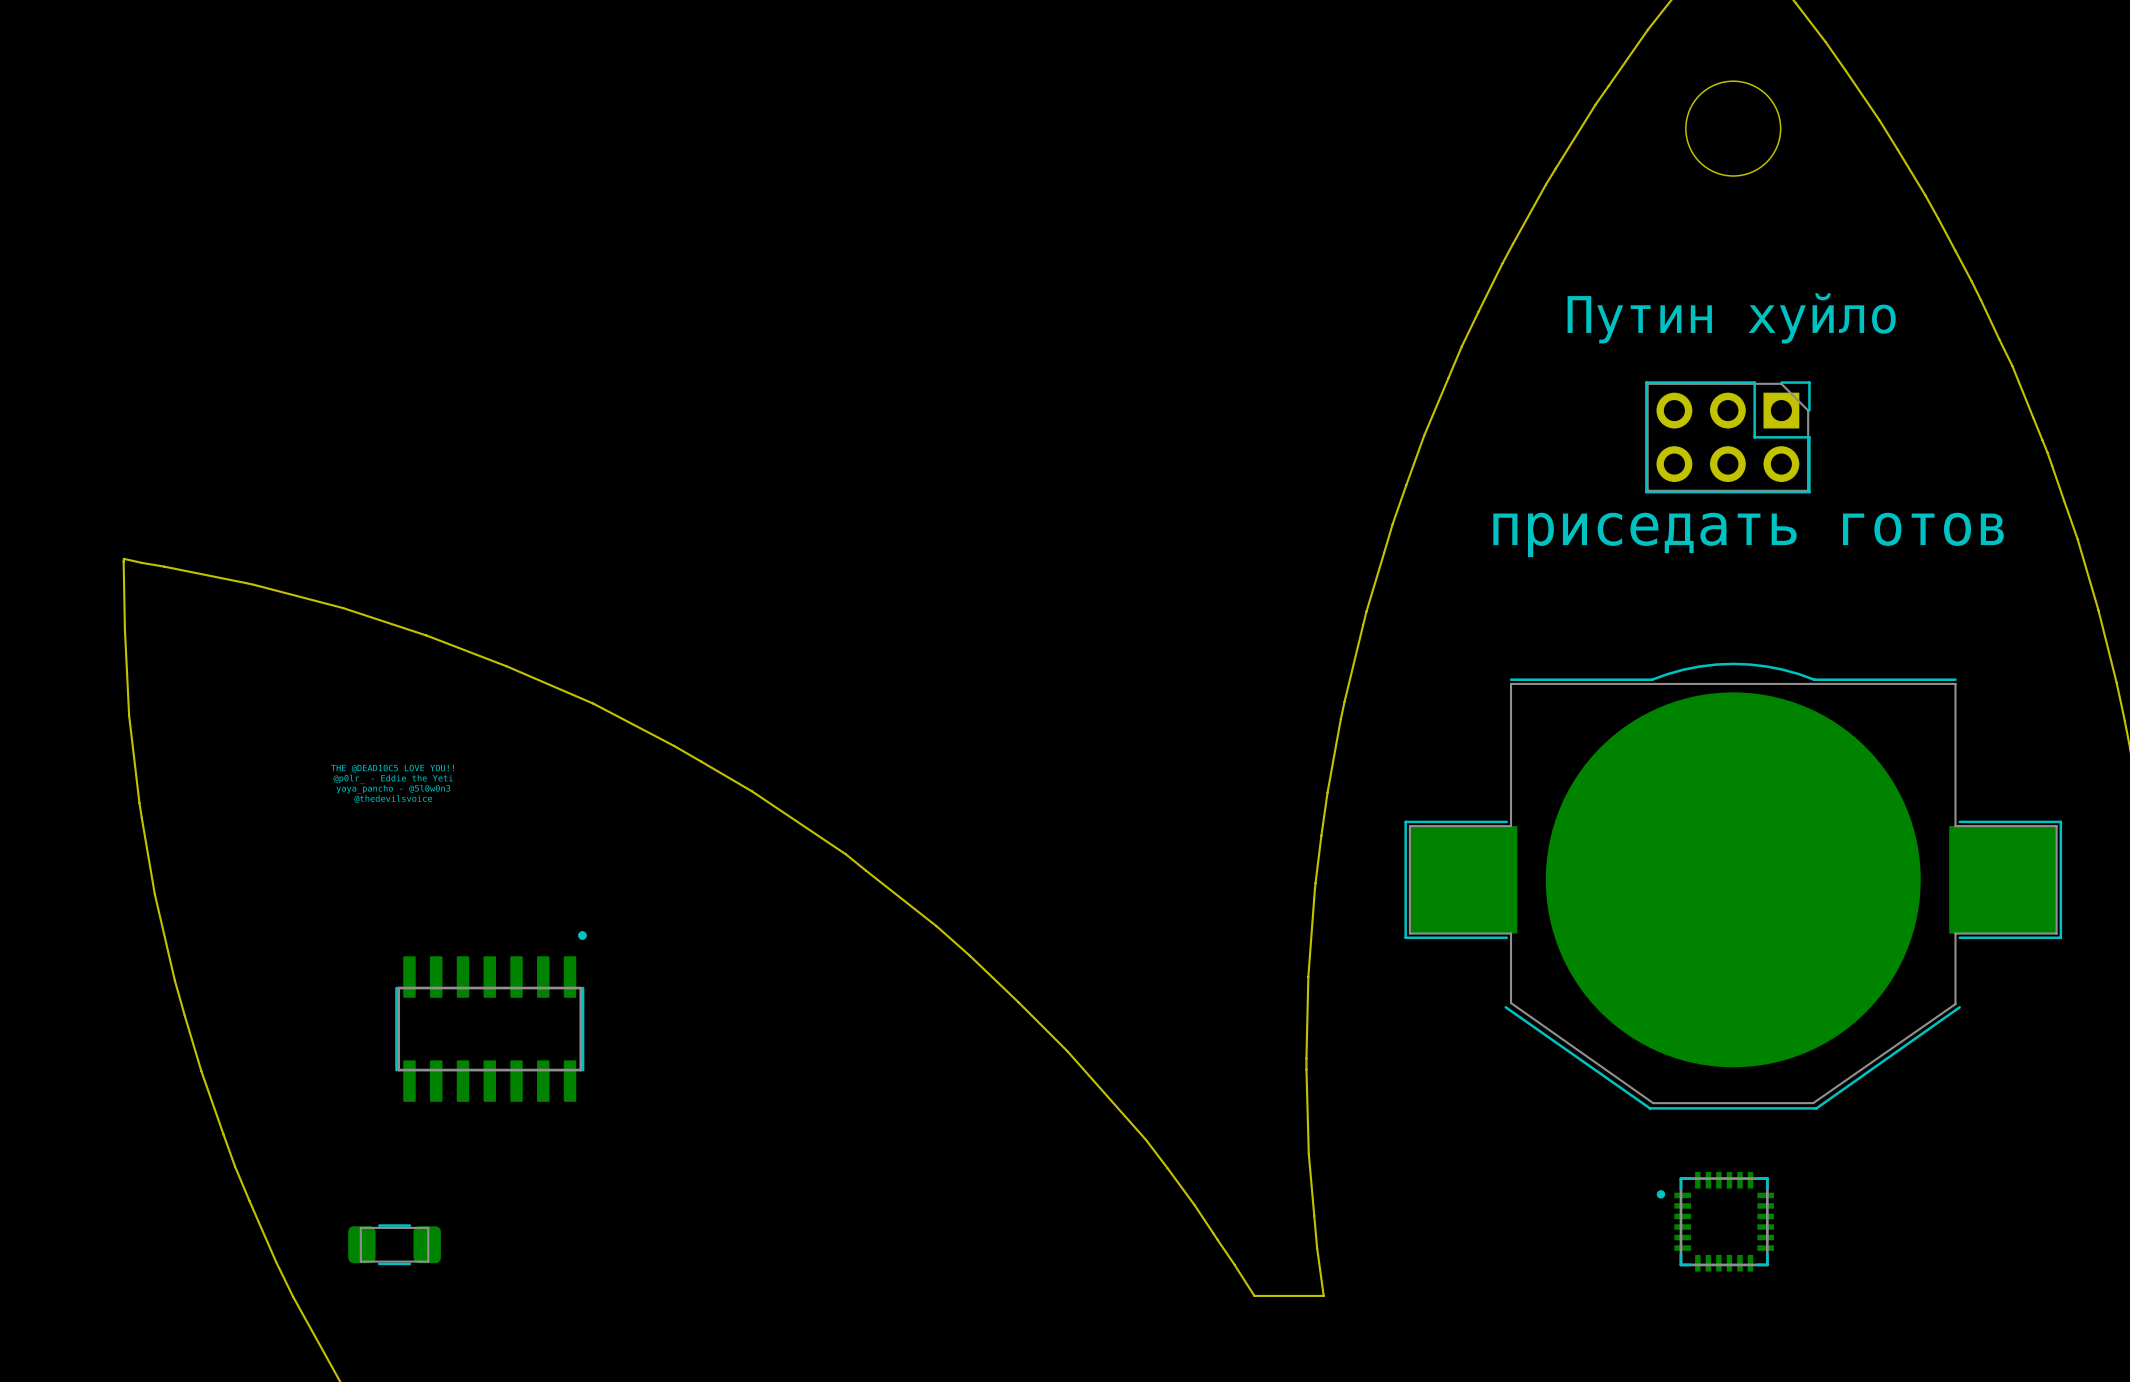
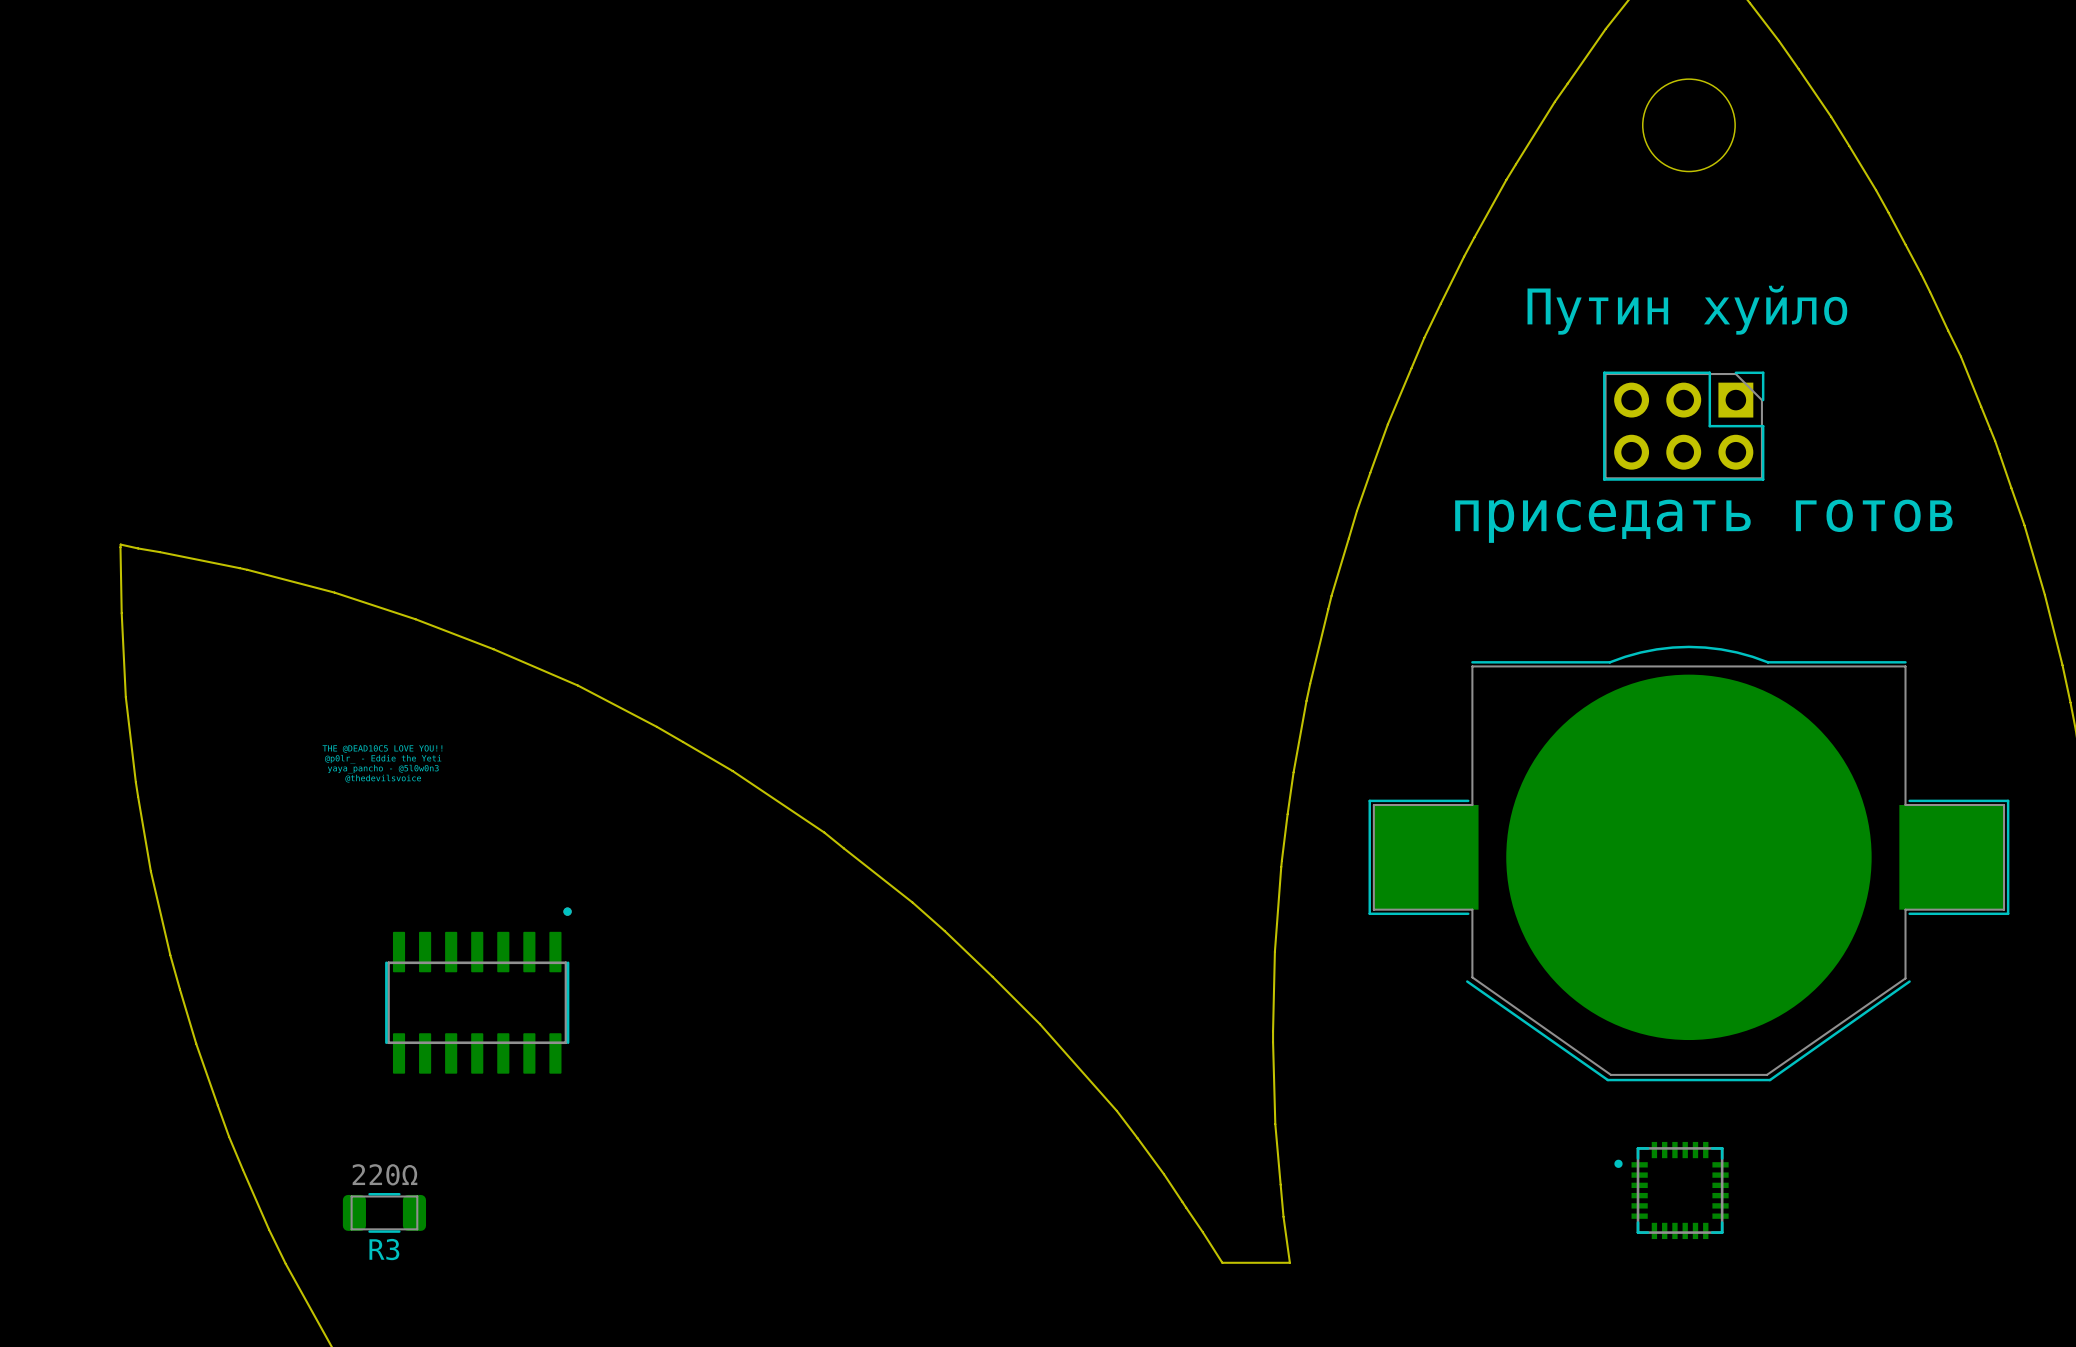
part: (394, 1244) -> none
R3: none -> 220Ω (384, 1212)

